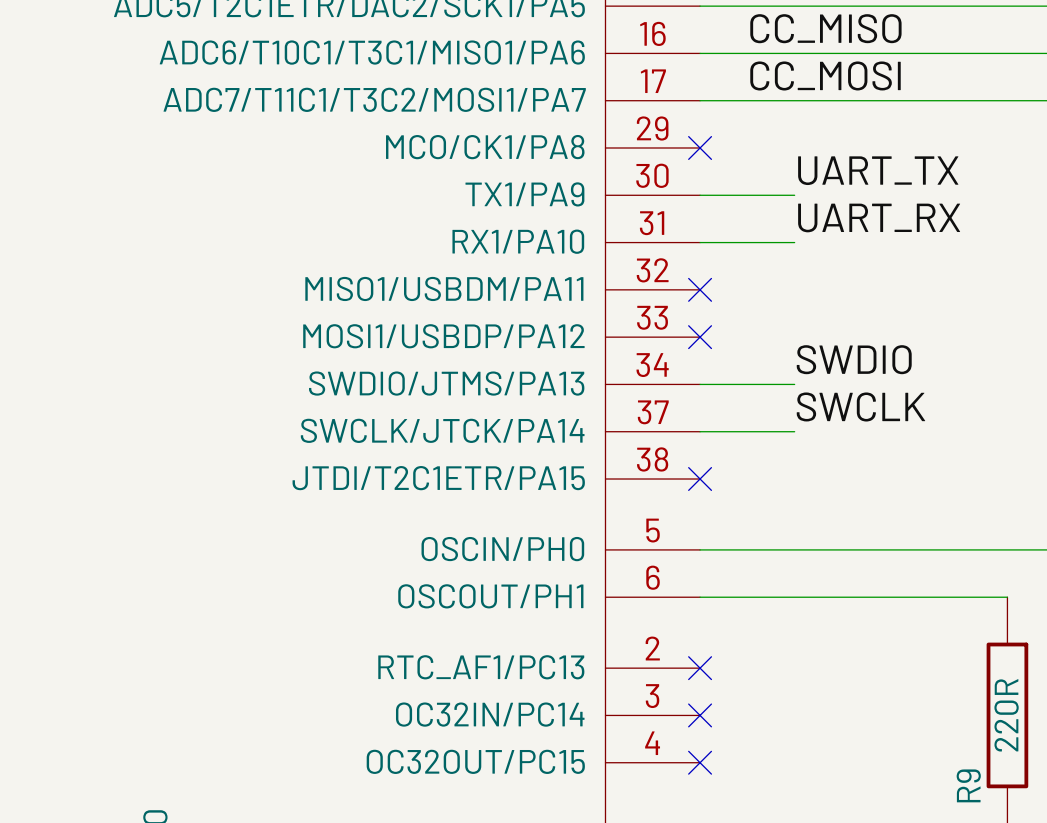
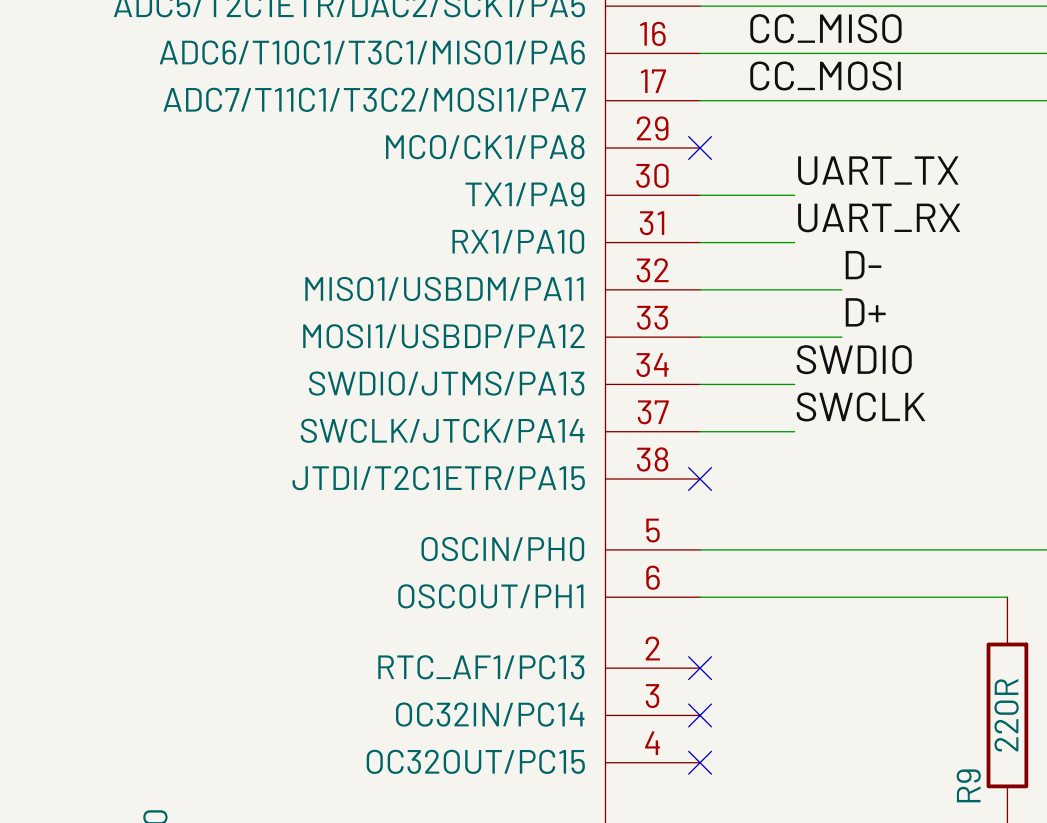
label: none -> D- (863, 265)
wire: none -> (700, 289) (841, 289)
no-connect mark: (700, 289) -> none
label: none -> D+ (865, 312)
wire: none -> (700, 337) (841, 337)
no-connect mark: (700, 337) -> none

